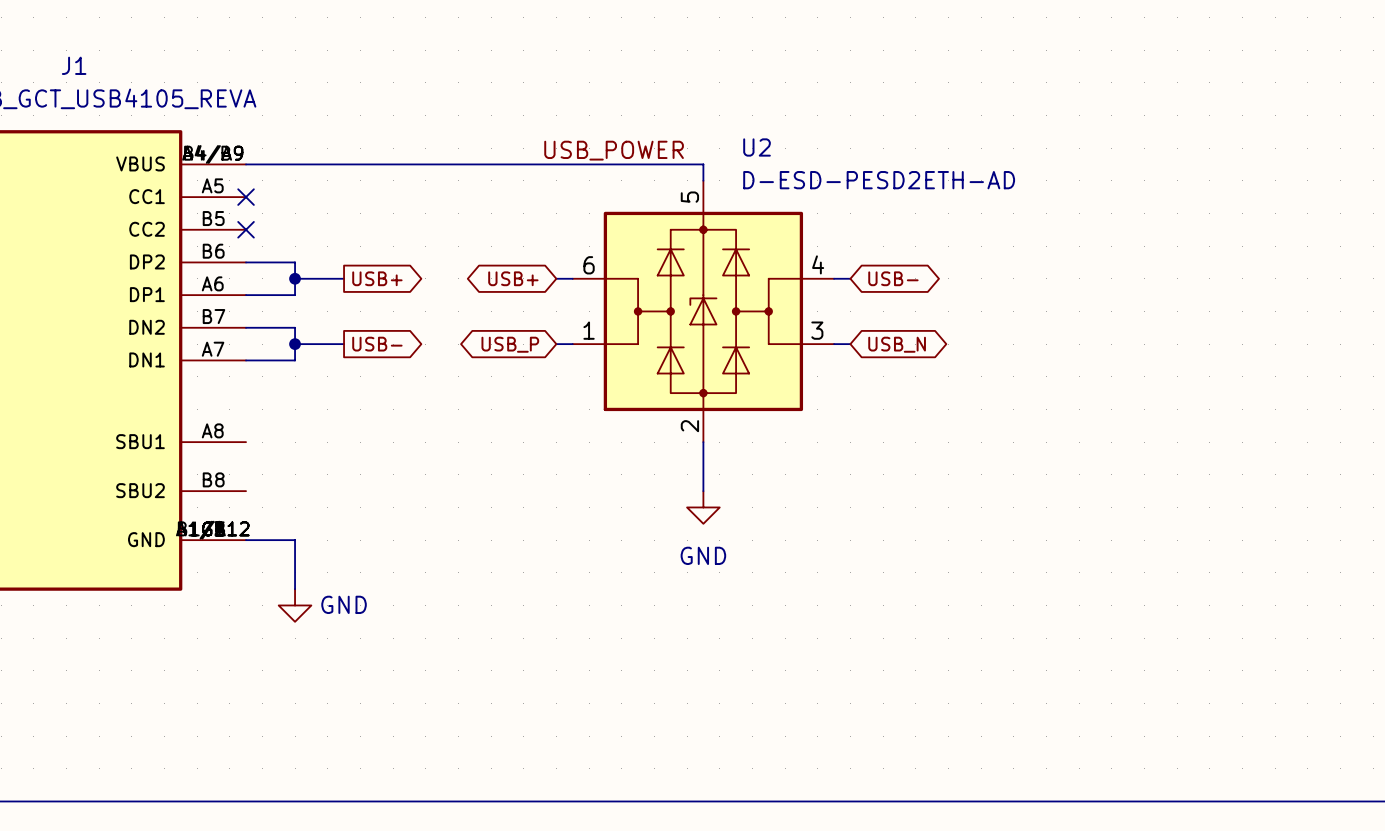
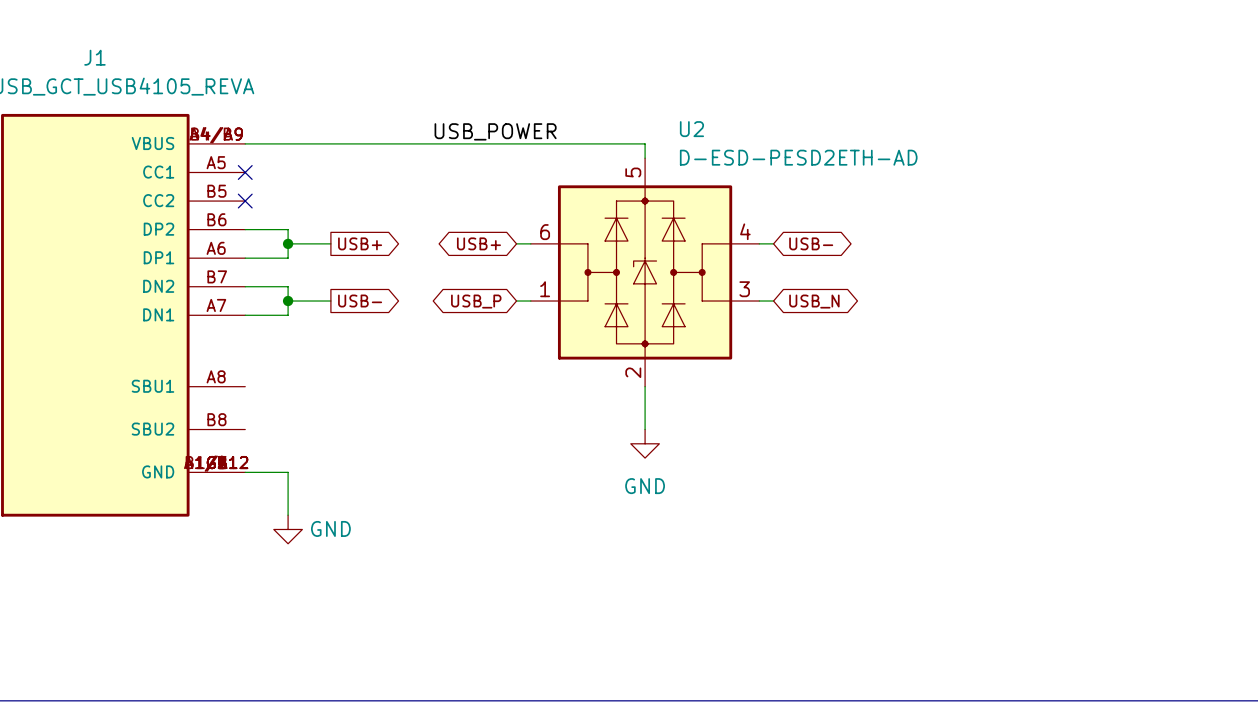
label position: USB_POWER (614, 150) -> USB_POWER (495, 131)

